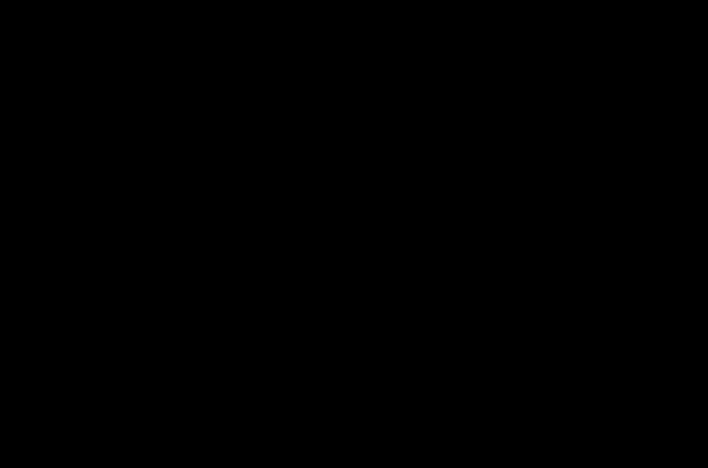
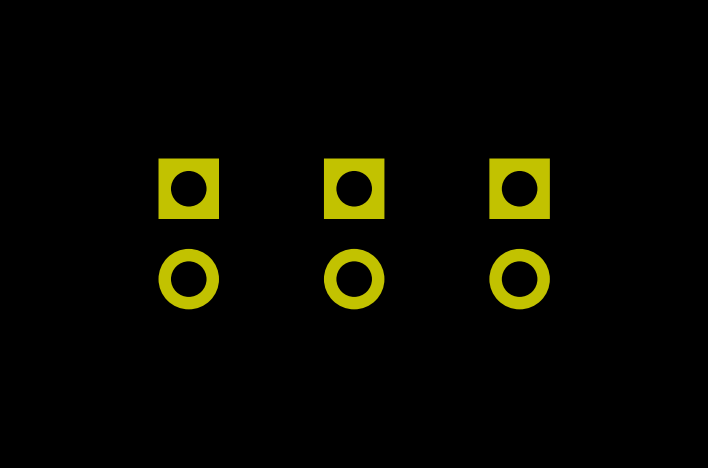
part: none -> (188, 233)
part: none -> (354, 233)
part: none -> (519, 233)

